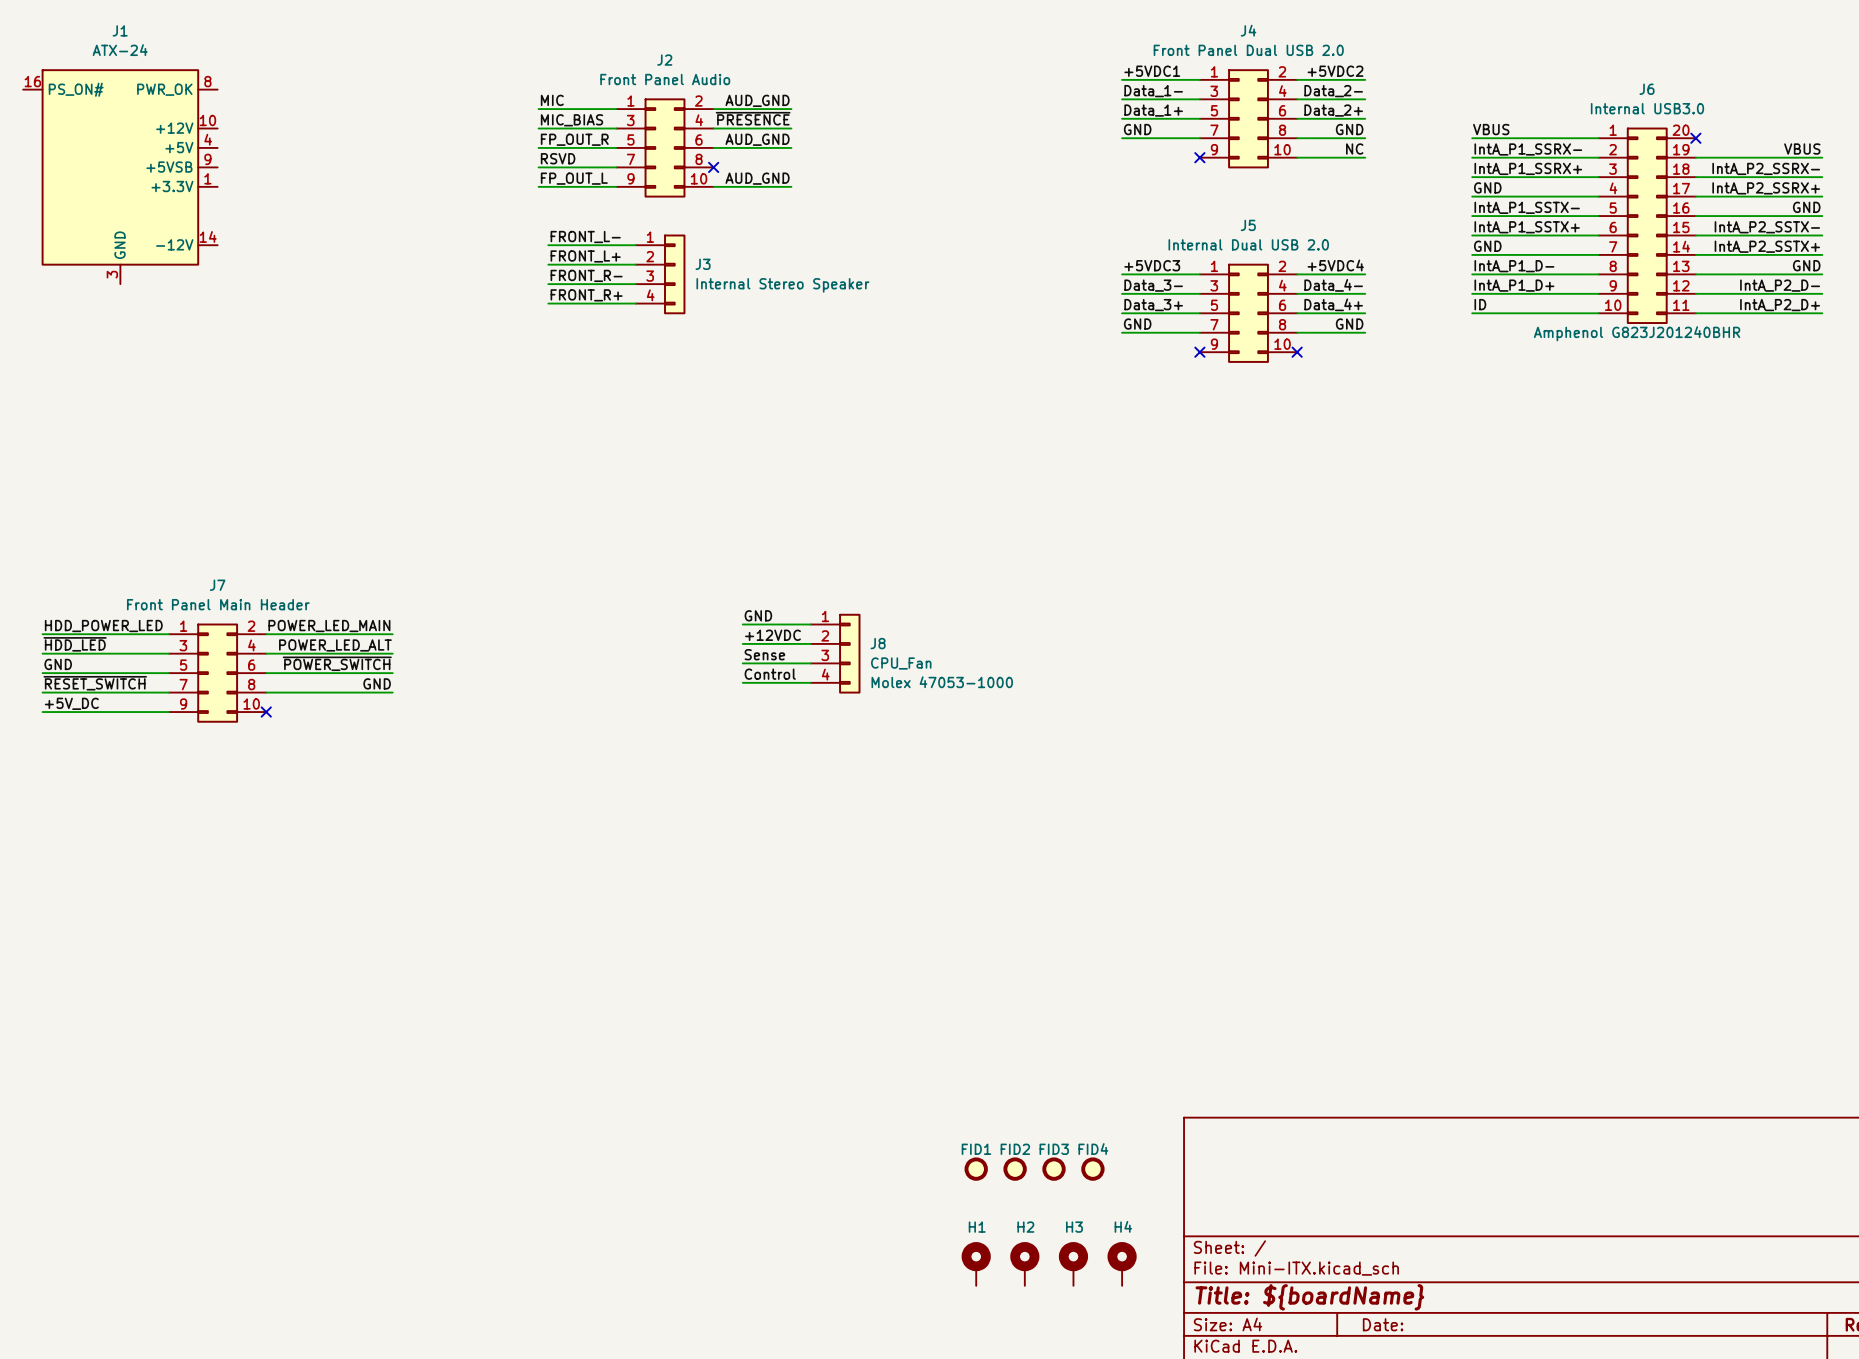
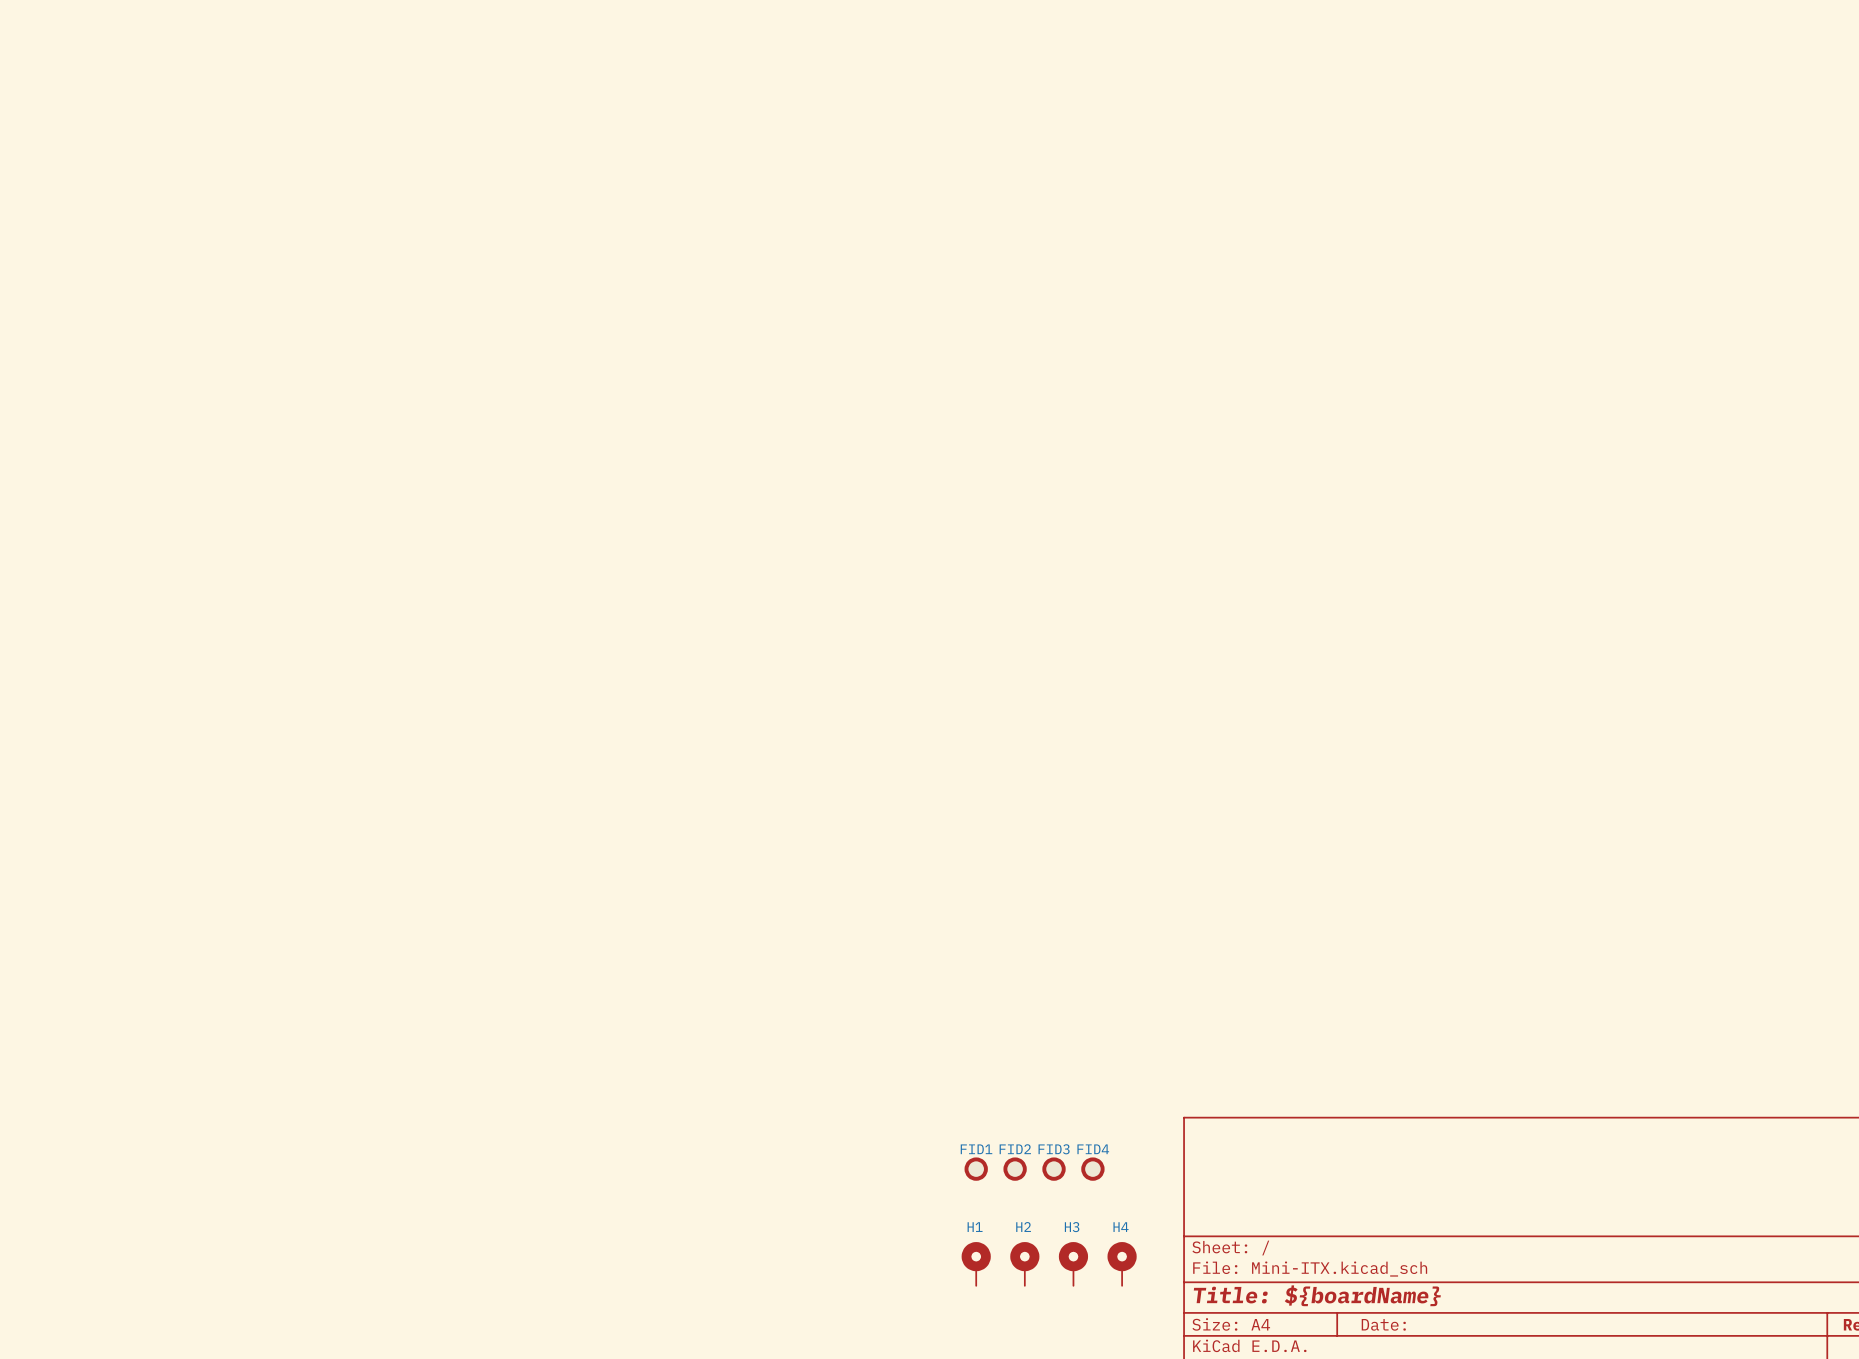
label: +5VDC1 (1152, 71) -> none
label: +5VDC2 (1335, 71) -> none
wire: (1122, 79) (1199, 79) -> none
wire: (1297, 79) (1365, 79) -> none
label: Data_1- (1153, 91) -> none
label: Data_2- (1333, 91) -> none
wire: (1122, 99) (1199, 99) -> none
wire: (1297, 99) (1365, 99) -> none
label: MIC (552, 100) -> none
label: AUD_GND (757, 100) -> none
wire: (538, 109) (616, 109) -> none
wire: (713, 109) (791, 109) -> none
label: Data_1+ (1153, 110) -> none
label: Data_2+ (1333, 110) -> none
label: ~{PRESENCE} (753, 118) -> none
wire: (1122, 118) (1199, 118) -> none
J4: Front Panel Dual USB 2.0 (1248, 118) -> none
wire: (1297, 118) (1365, 118) -> none
label: MIC_BIAS (571, 120) -> none
wire: (538, 128) (616, 128) -> none
wire: (713, 128) (791, 128) -> none
label: GND (1137, 129) -> none
label: GND (1349, 129) -> none
label: VBUS (1491, 129) -> none
wire: (1122, 138) (1199, 138) -> none
wire: (1297, 138) (1365, 138) -> none
wire: (1472, 138) (1598, 138) -> none
no-connect mark: (1695, 138) -> none
label: FP_OUT_R (574, 139) -> none
label: AUD_GND (757, 139) -> none
wire: (538, 147) (616, 147) -> none
J2: Front Panel Audio (665, 147) -> none
wire: (713, 147) (791, 147) -> none
label: NC (1354, 149) -> none
label: IntA_P1_SSRX- (1528, 149) -> none
label: VBUS (1802, 149) -> none
no-connect mark: (1199, 157) -> none
wire: (1297, 157) (1365, 157) -> none
wire: (1472, 157) (1598, 157) -> none
wire: (1695, 157) (1822, 157) -> none
label: RSVD (558, 158) -> none
wire: (538, 167) (616, 167) -> none
no-connect mark: (713, 167) -> none
label: IntA_P1_SSRX+ (1528, 168) -> none
label: IntA_P2_SSRX- (1766, 168) -> none
J1: ATX-24 (120, 176) -> none
wire: (1472, 177) (1598, 177) -> none
wire: (1695, 177) (1822, 177) -> none
label: FP_OUT_L (574, 178) -> none
label: AUD_GND (757, 178) -> none
wire: (538, 186) (616, 186) -> none
wire: (713, 186) (791, 186) -> none
label: GND (1487, 187) -> none
label: IntA_P2_SSRX+ (1766, 188) -> none
wire: (1472, 196) (1598, 196) -> none
wire: (1695, 196) (1822, 196) -> none
label: IntA_P1_SSTX- (1527, 207) -> none
label: GND (1806, 207) -> none
wire: (1472, 216) (1598, 216) -> none
wire: (1695, 216) (1822, 216) -> none
J6: Internal USB3.0 (1647, 225) -> none
label: IntA_P1_SSTX+ (1527, 227) -> none
label: IntA_P2_SSTX- (1767, 227) -> none
wire: (1472, 235) (1598, 235) -> none
wire: (1695, 235) (1822, 235) -> none
label: FRONT_L- (585, 237) -> none
wire: (548, 245) (635, 245) -> none
label: GND (1487, 246) -> none
label: IntA_P2_SSTX+ (1767, 246) -> none
wire: (1472, 254) (1598, 254) -> none
wire: (1695, 254) (1822, 254) -> none
label: FRONT_L+ (585, 256) -> none
wire: (548, 264) (635, 264) -> none
label: +5VDC3 (1152, 265) -> none
label: +5VDC4 (1335, 265) -> none
label: GND (1806, 265) -> none
label: IntA_P1_D- (1514, 266) -> none
J3: Internal Stereo Speaker (660, 274) -> none
wire: (1122, 274) (1199, 274) -> none
wire: (1297, 274) (1365, 274) -> none
wire: (1472, 274) (1598, 274) -> none
wire: (1695, 274) (1822, 274) -> none
label: FRONT_R- (586, 275) -> none
wire: (548, 284) (635, 284) -> none
label: Data_3- (1153, 285) -> none
label: Data_4- (1333, 285) -> none
label: IntA_P1_D+ (1514, 285) -> none
label: IntA_P2_D- (1780, 285) -> none
wire: (1122, 293) (1199, 293) -> none
wire: (1297, 293) (1365, 293) -> none
wire: (1472, 293) (1598, 293) -> none
wire: (1695, 293) (1822, 293) -> none
label: FRONT_R+ (586, 295) -> none
wire: (548, 303) (635, 303) -> none
label: Data_4+ (1333, 304) -> none
label: ID (1480, 304) -> none
label: Data_3+ (1153, 305) -> none
label: IntA_P2_D+ (1780, 305) -> none
wire: (1122, 313) (1199, 313) -> none
J5: Internal Dual USB 2.0 (1248, 313) -> none
wire: (1297, 313) (1365, 313) -> none
wire: (1472, 313) (1598, 313) -> none
wire: (1695, 313) (1822, 313) -> none
label: GND (1137, 324) -> none
label: GND (1349, 324) -> none
wire: (1122, 332) (1199, 332) -> none
wire: (1297, 332) (1365, 332) -> none
no-connect mark: (1199, 352) -> none
no-connect mark: (1297, 352) -> none
label: GND (758, 615) -> none
wire: (742, 624) (810, 624) -> none
label: HDD_POWER_LED (103, 626) -> none
label: POWER_LED_MAIN (329, 626) -> none
wire: (42, 634) (169, 634) -> none
wire: (266, 634) (392, 634) -> none
label: +12VDC (772, 635) -> none
wire: (742, 643) (810, 643) -> none
label: ~{HDD_LED} (75, 644) -> none
label: POWER_LED_ALT (335, 645) -> none
wire: (42, 653) (169, 653) -> none
wire: (266, 653) (392, 653) -> none
J8: CPU_Fan (835, 653) -> none
label: Sense (764, 654) -> none
label: ~{POWER_SWITCH} (337, 663) -> none
wire: (742, 663) (810, 663) -> none
label: GND (58, 664) -> none
wire: (42, 673) (169, 673) -> none
J7: Front Panel Main Header (217, 673) -> none
wire: (266, 673) (392, 673) -> none
label: Control (770, 674) -> none
wire: (742, 682) (810, 682) -> none
label: ~{RESET_SWITCH} (95, 683) -> none
label: GND (377, 683) -> none
wire: (42, 692) (169, 692) -> none
wire: (266, 692) (392, 692) -> none
label: +5V_DC (71, 703) -> none
wire: (42, 712) (169, 712) -> none
no-connect mark: (266, 712) -> none

